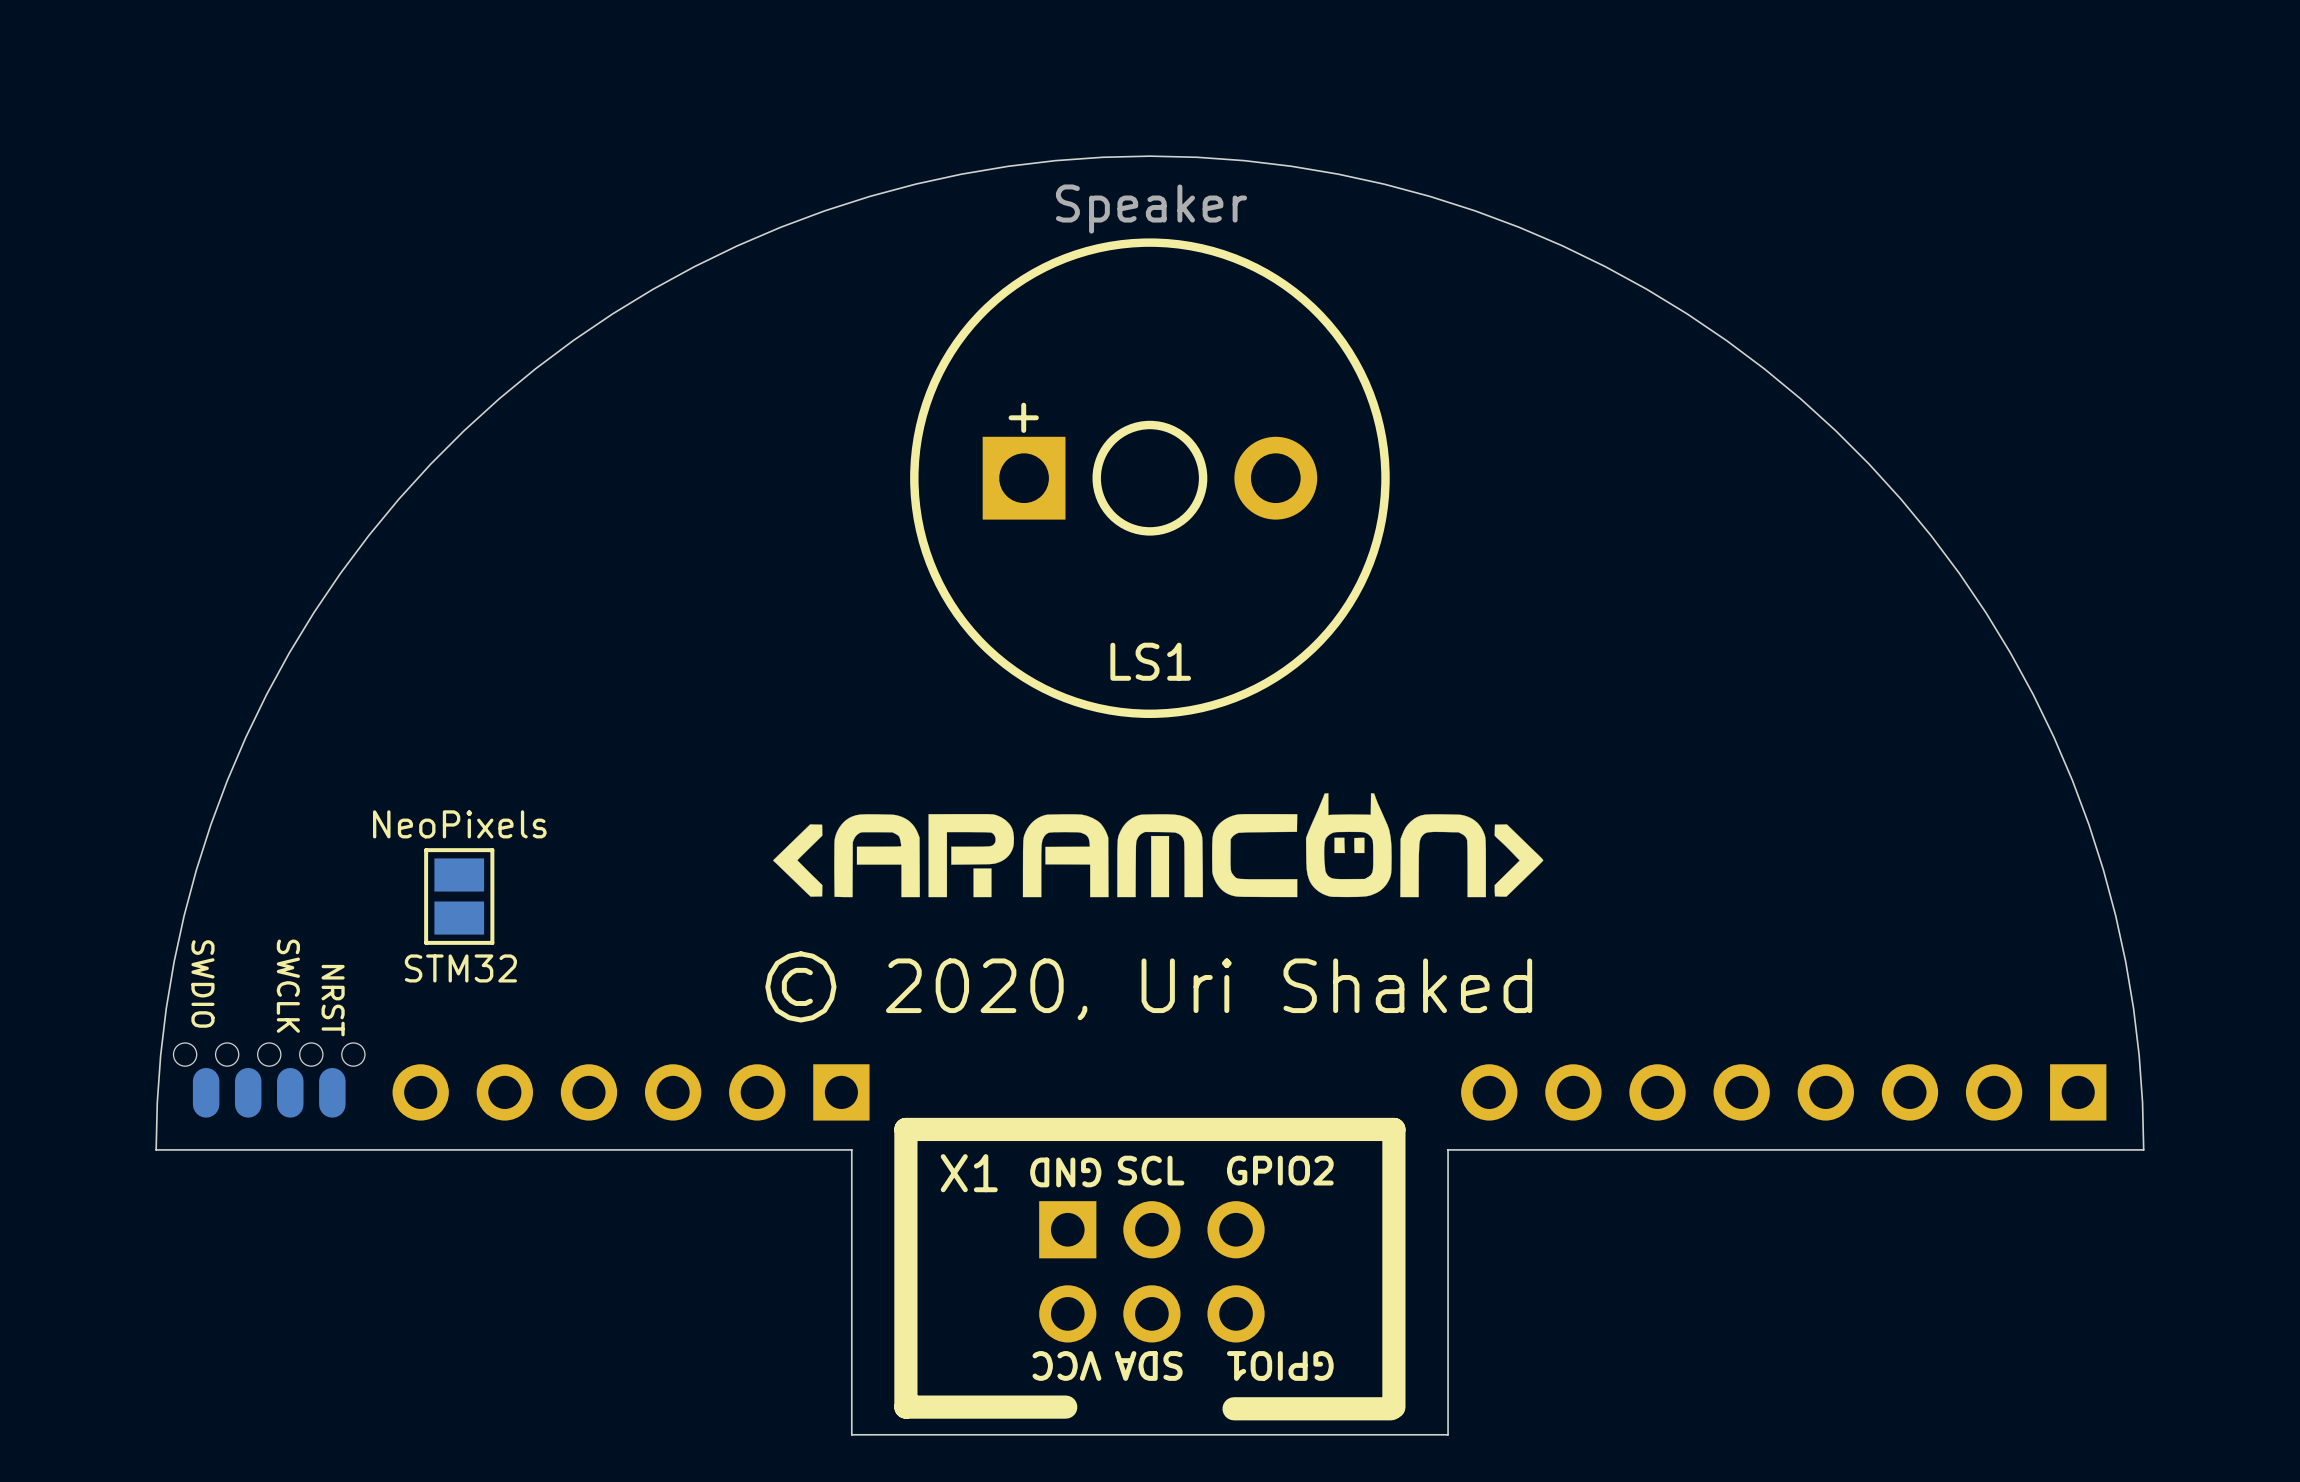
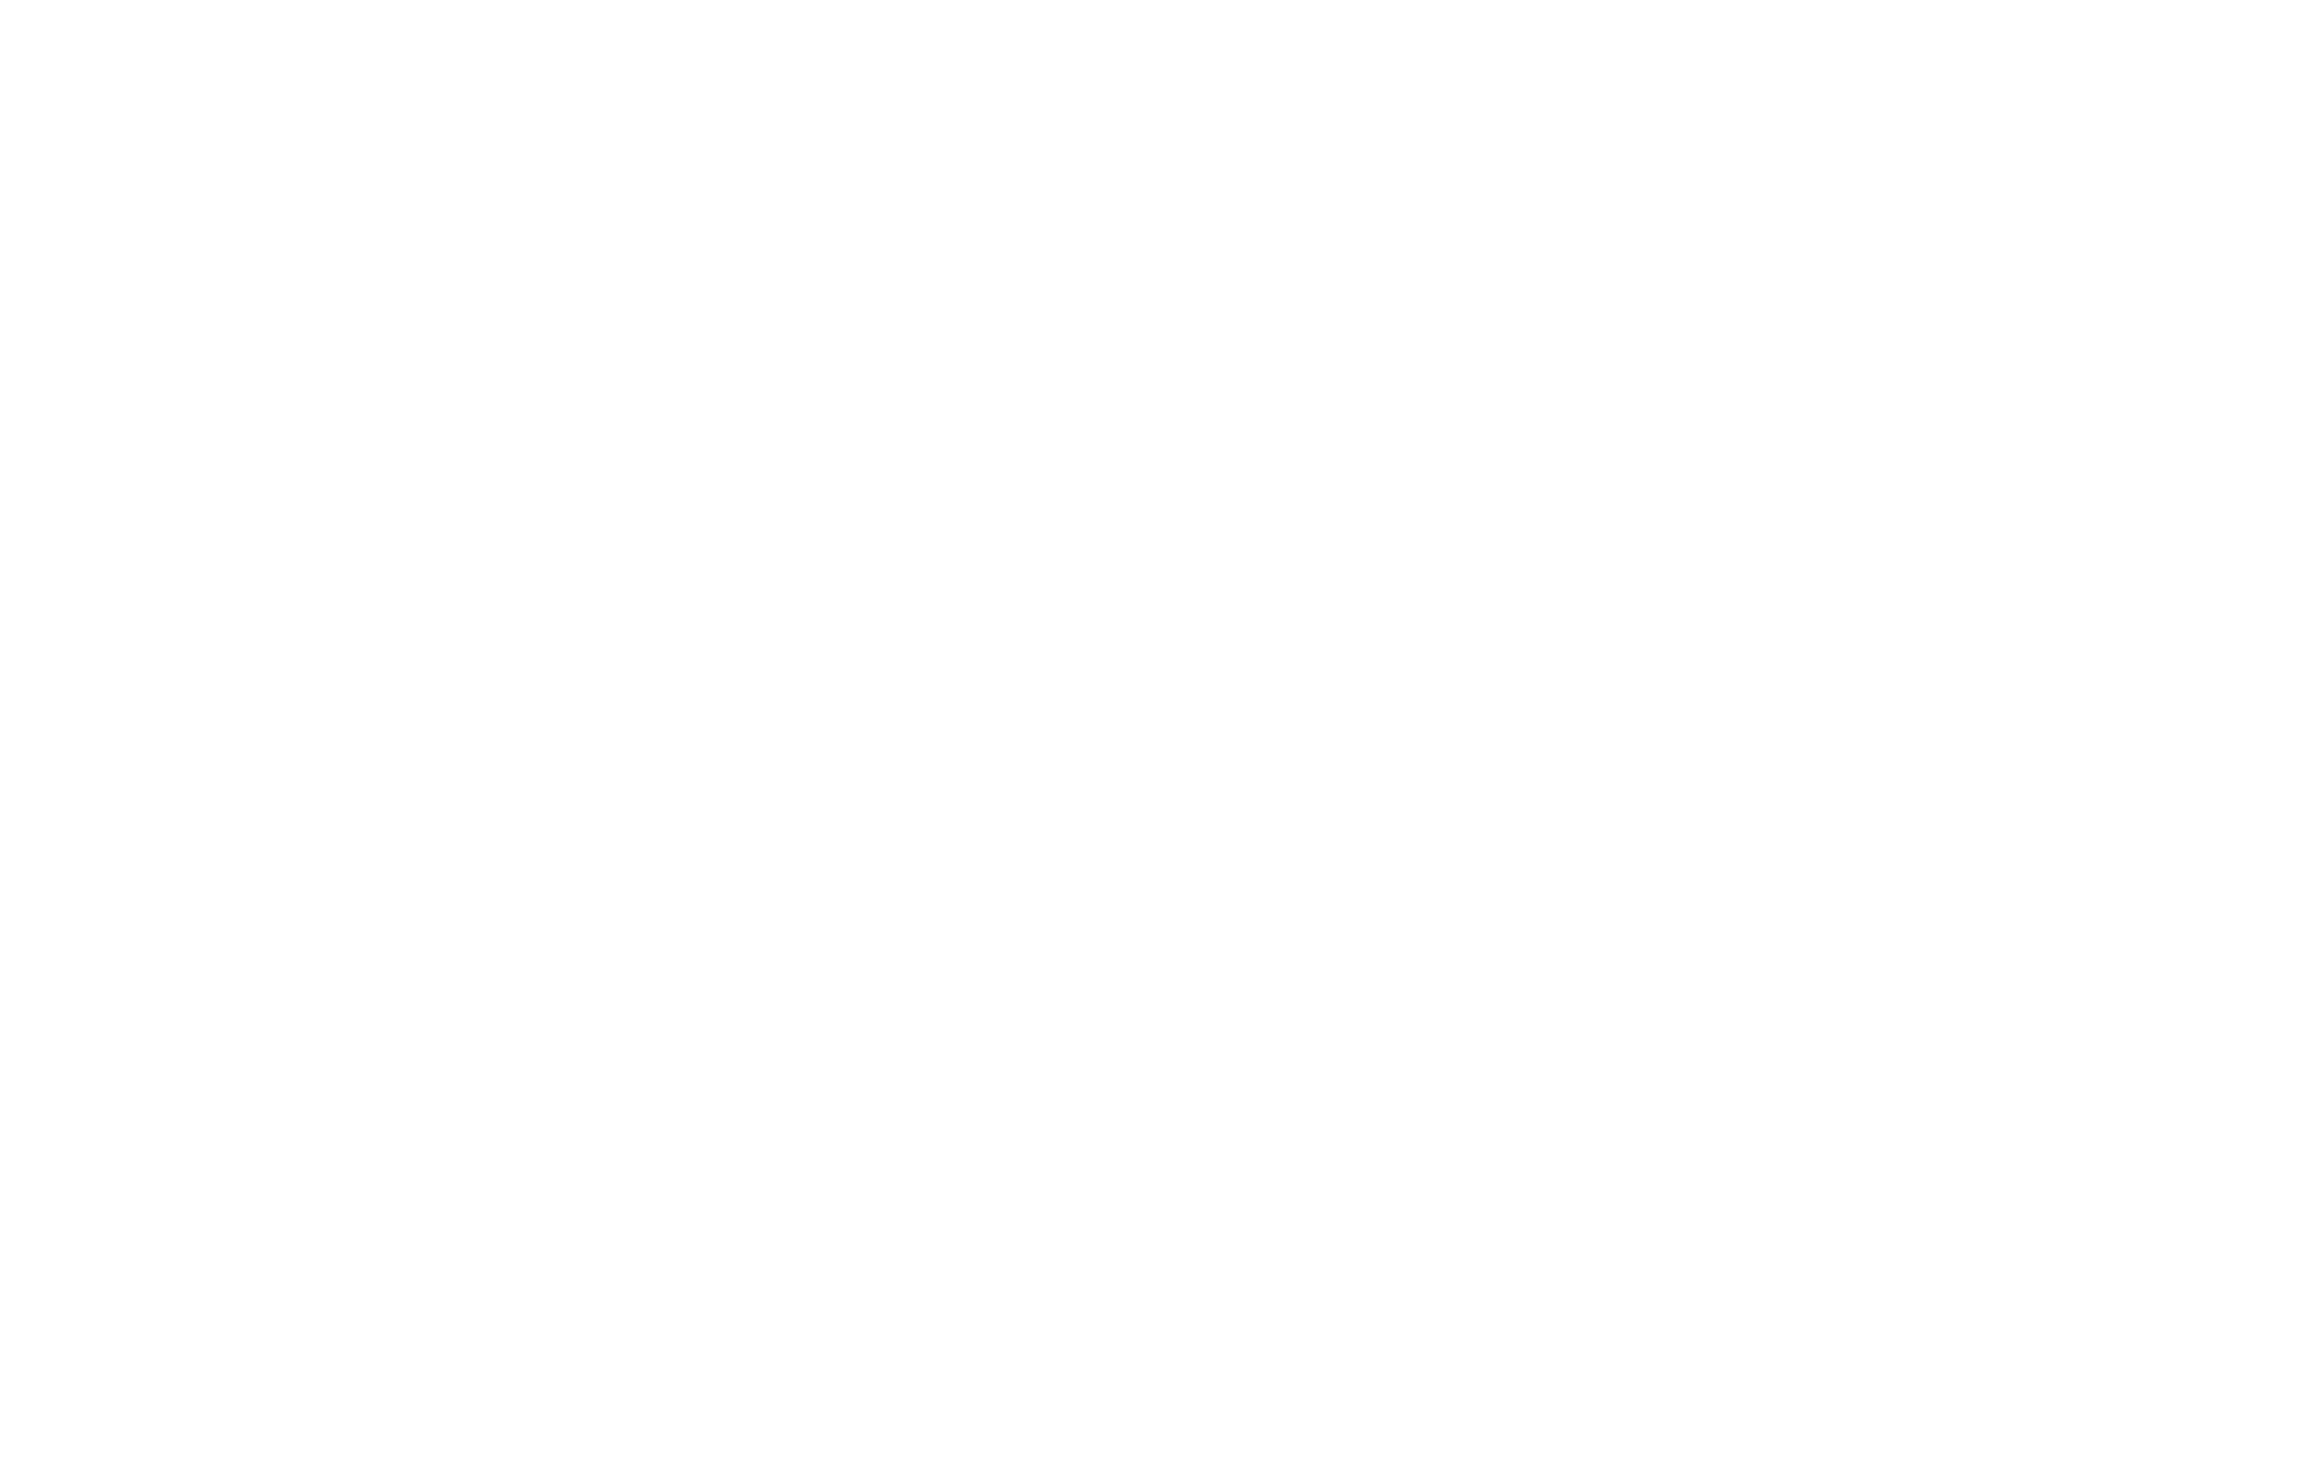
LS1: Speaker (1149, 478) -> none
drawing: [772, 793, 1544, 898] -> none
text: NeoPixels (459, 824) -> none
part: (459, 896) -> none
text: STM32 (460, 968) -> none
text: SWDIO (202, 983) -> none
text: SWCLK (288, 986) -> none
text: © 2020, Uri Shaked (1148, 986) -> none
text: NRST (333, 1000) -> none
part: (269, 1080) -> none
part: (631, 1092) -> none
part: (1783, 1092) -> none
board edge: (2143, 1149) (1448, 1149) (1448, 1434) (851, 1434) (851, 1149) (156, 1149) (160, 1055) (174, 961) (196, 869) (227, 780) (266, 694) (313, 612) (340, 573) (398, 499) (464, 430) (535, 368) (612, 313) (694, 266) (780, 227) (869, 196) (961, 174) (1055, 160) (1149, 156) (1244, 160) (1337, 174) (1429, 196) (1519, 227) (1605, 266) (1687, 313) (1764, 368) (1835, 430) (1900, 499) (1959, 573) (1985, 612) (2033, 694) (2072, 780) (2103, 869) (2125, 961) (2139, 1055) (2143, 1149) -> none
X1: (1149, 1269) -> none

